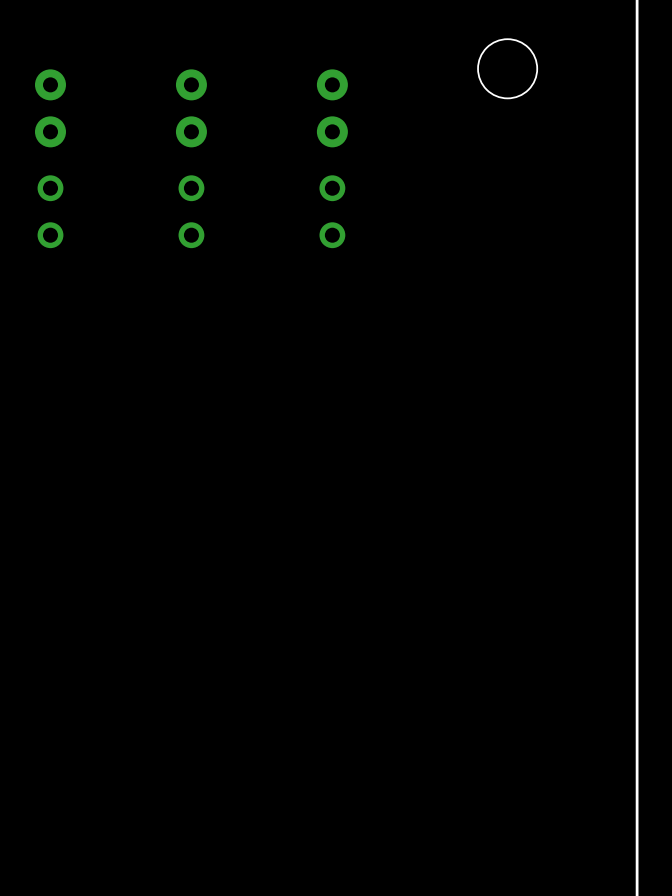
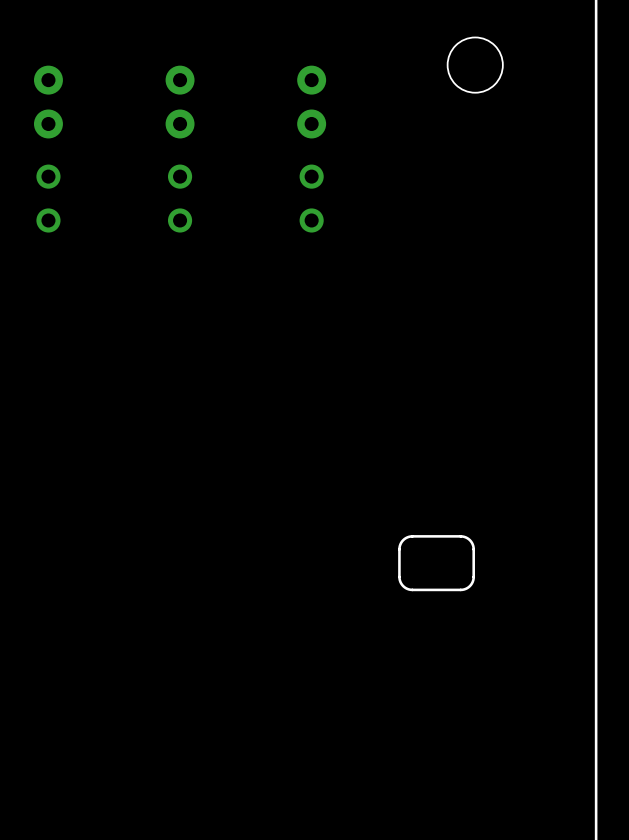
part: none -> (436, 563)

